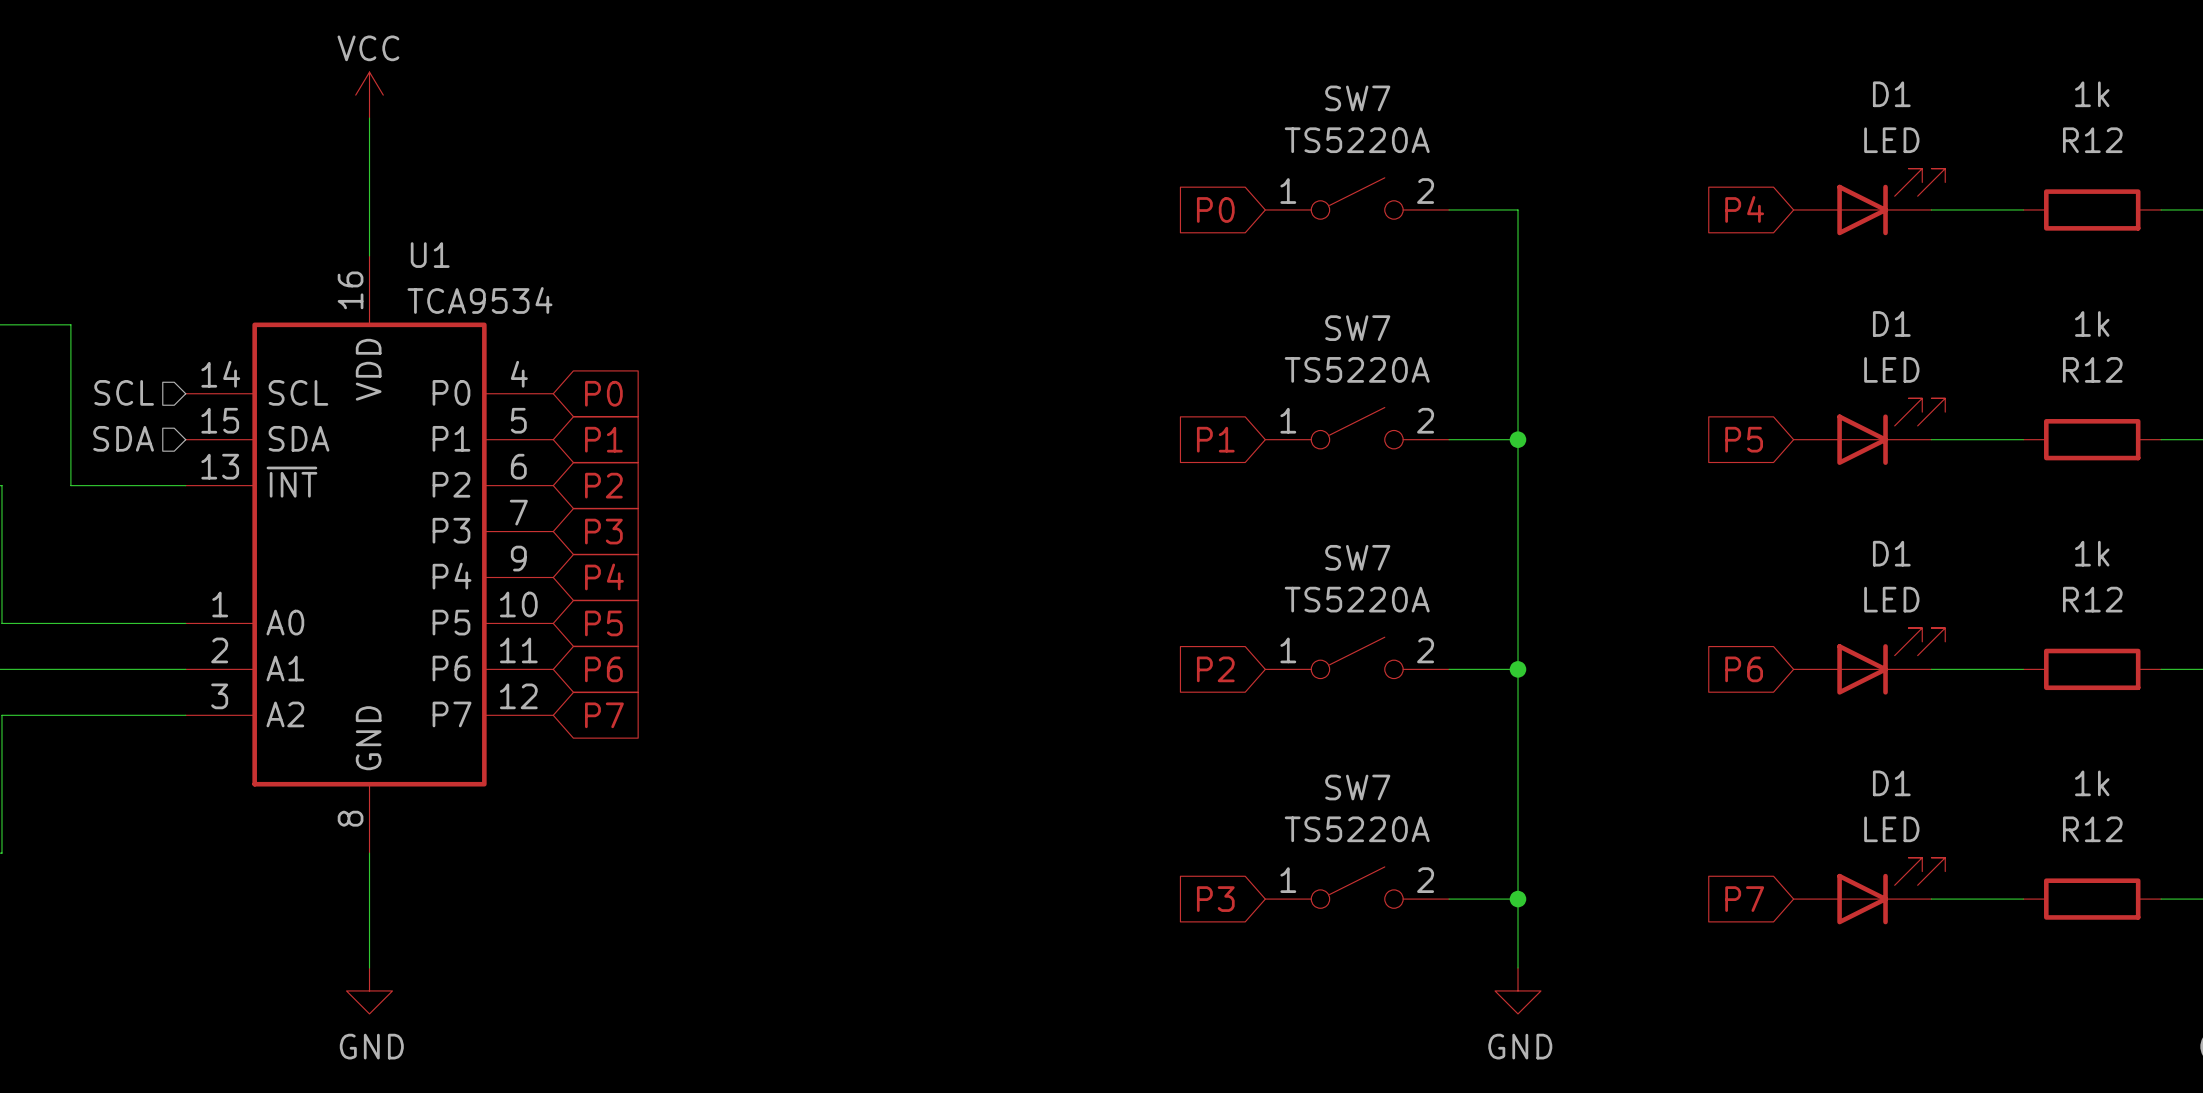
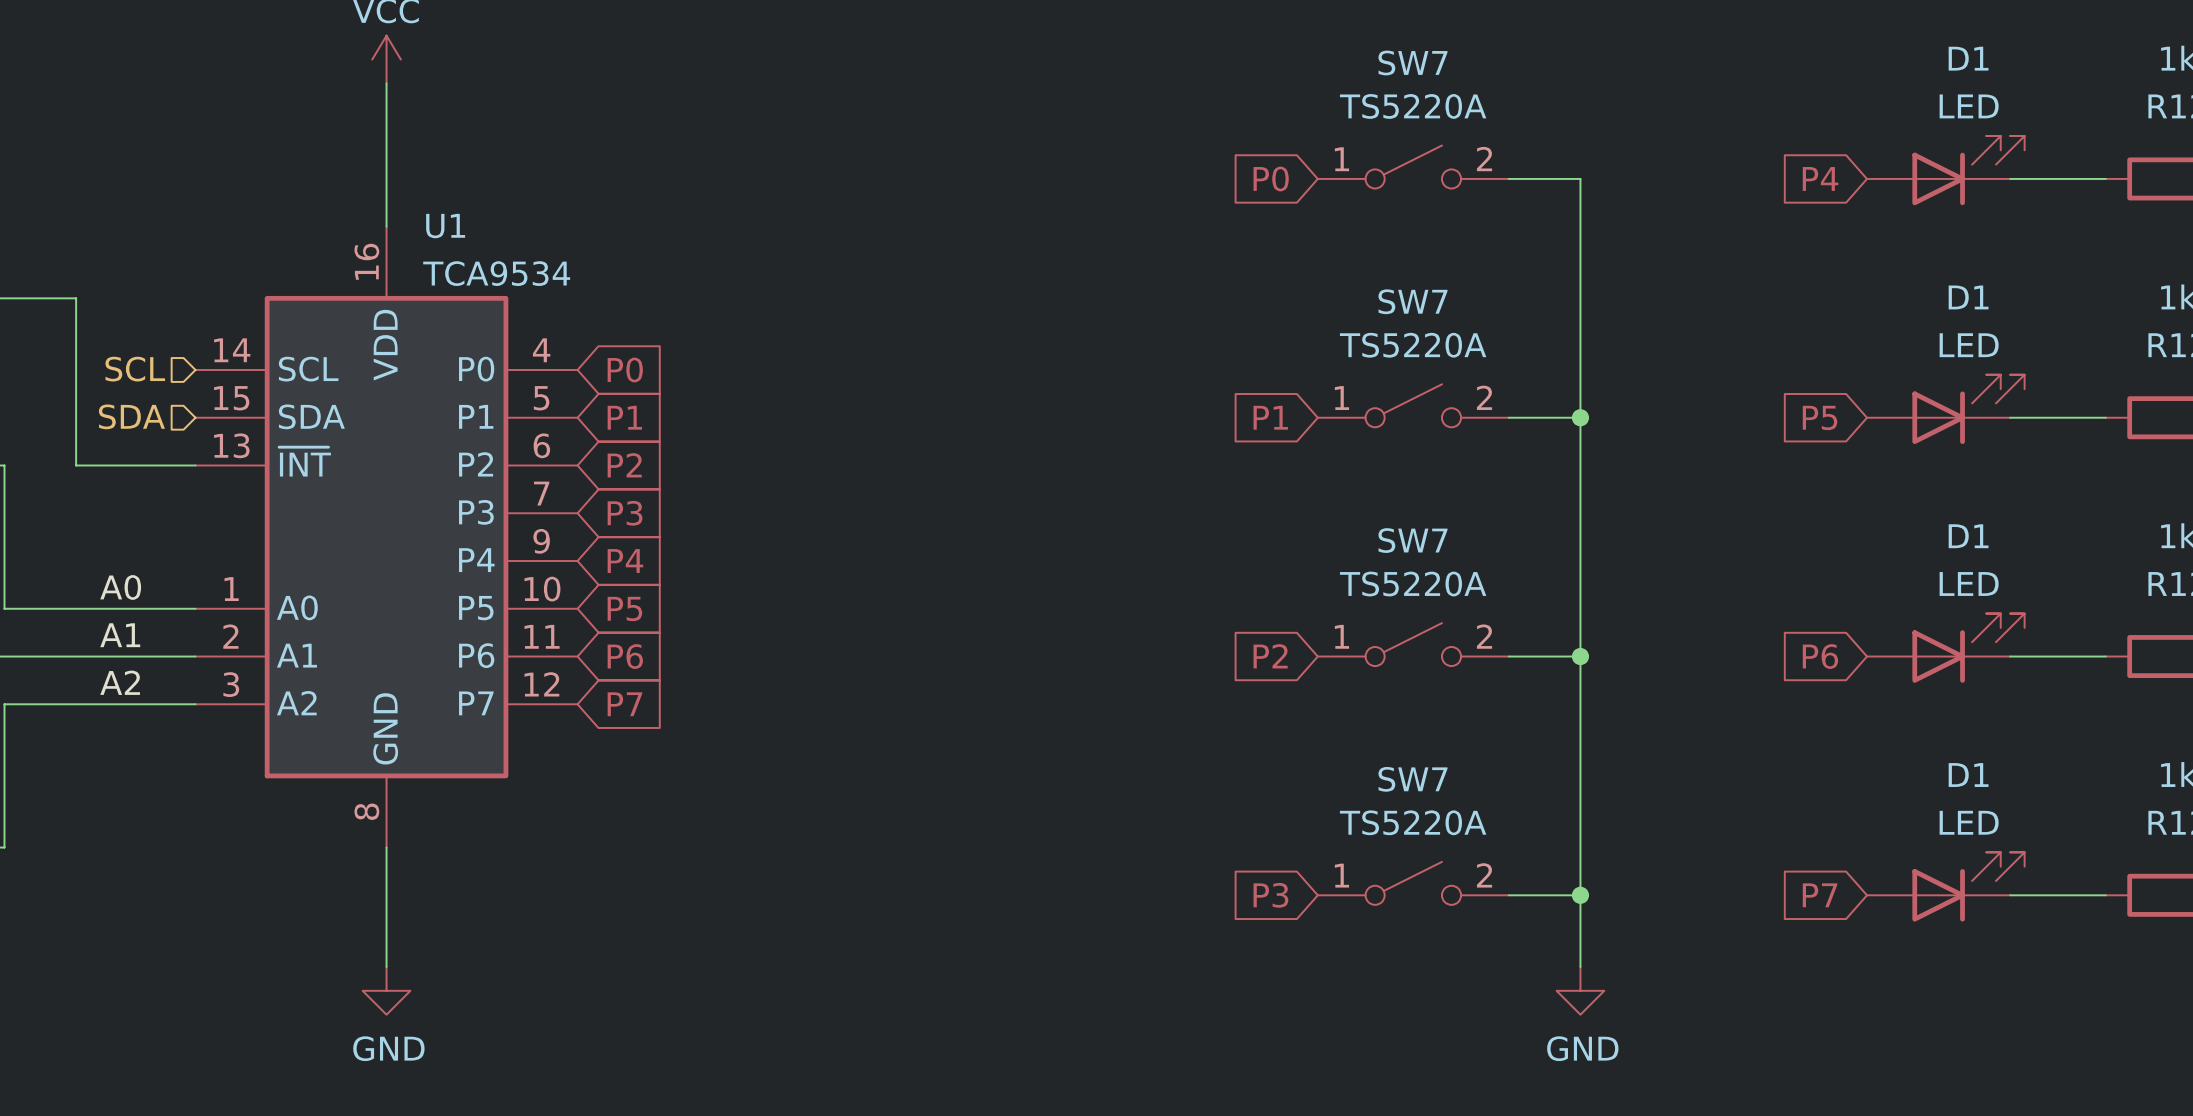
label: none -> A0 (120, 587)
label: none -> A1 (120, 635)
label: none -> A2 (120, 682)

